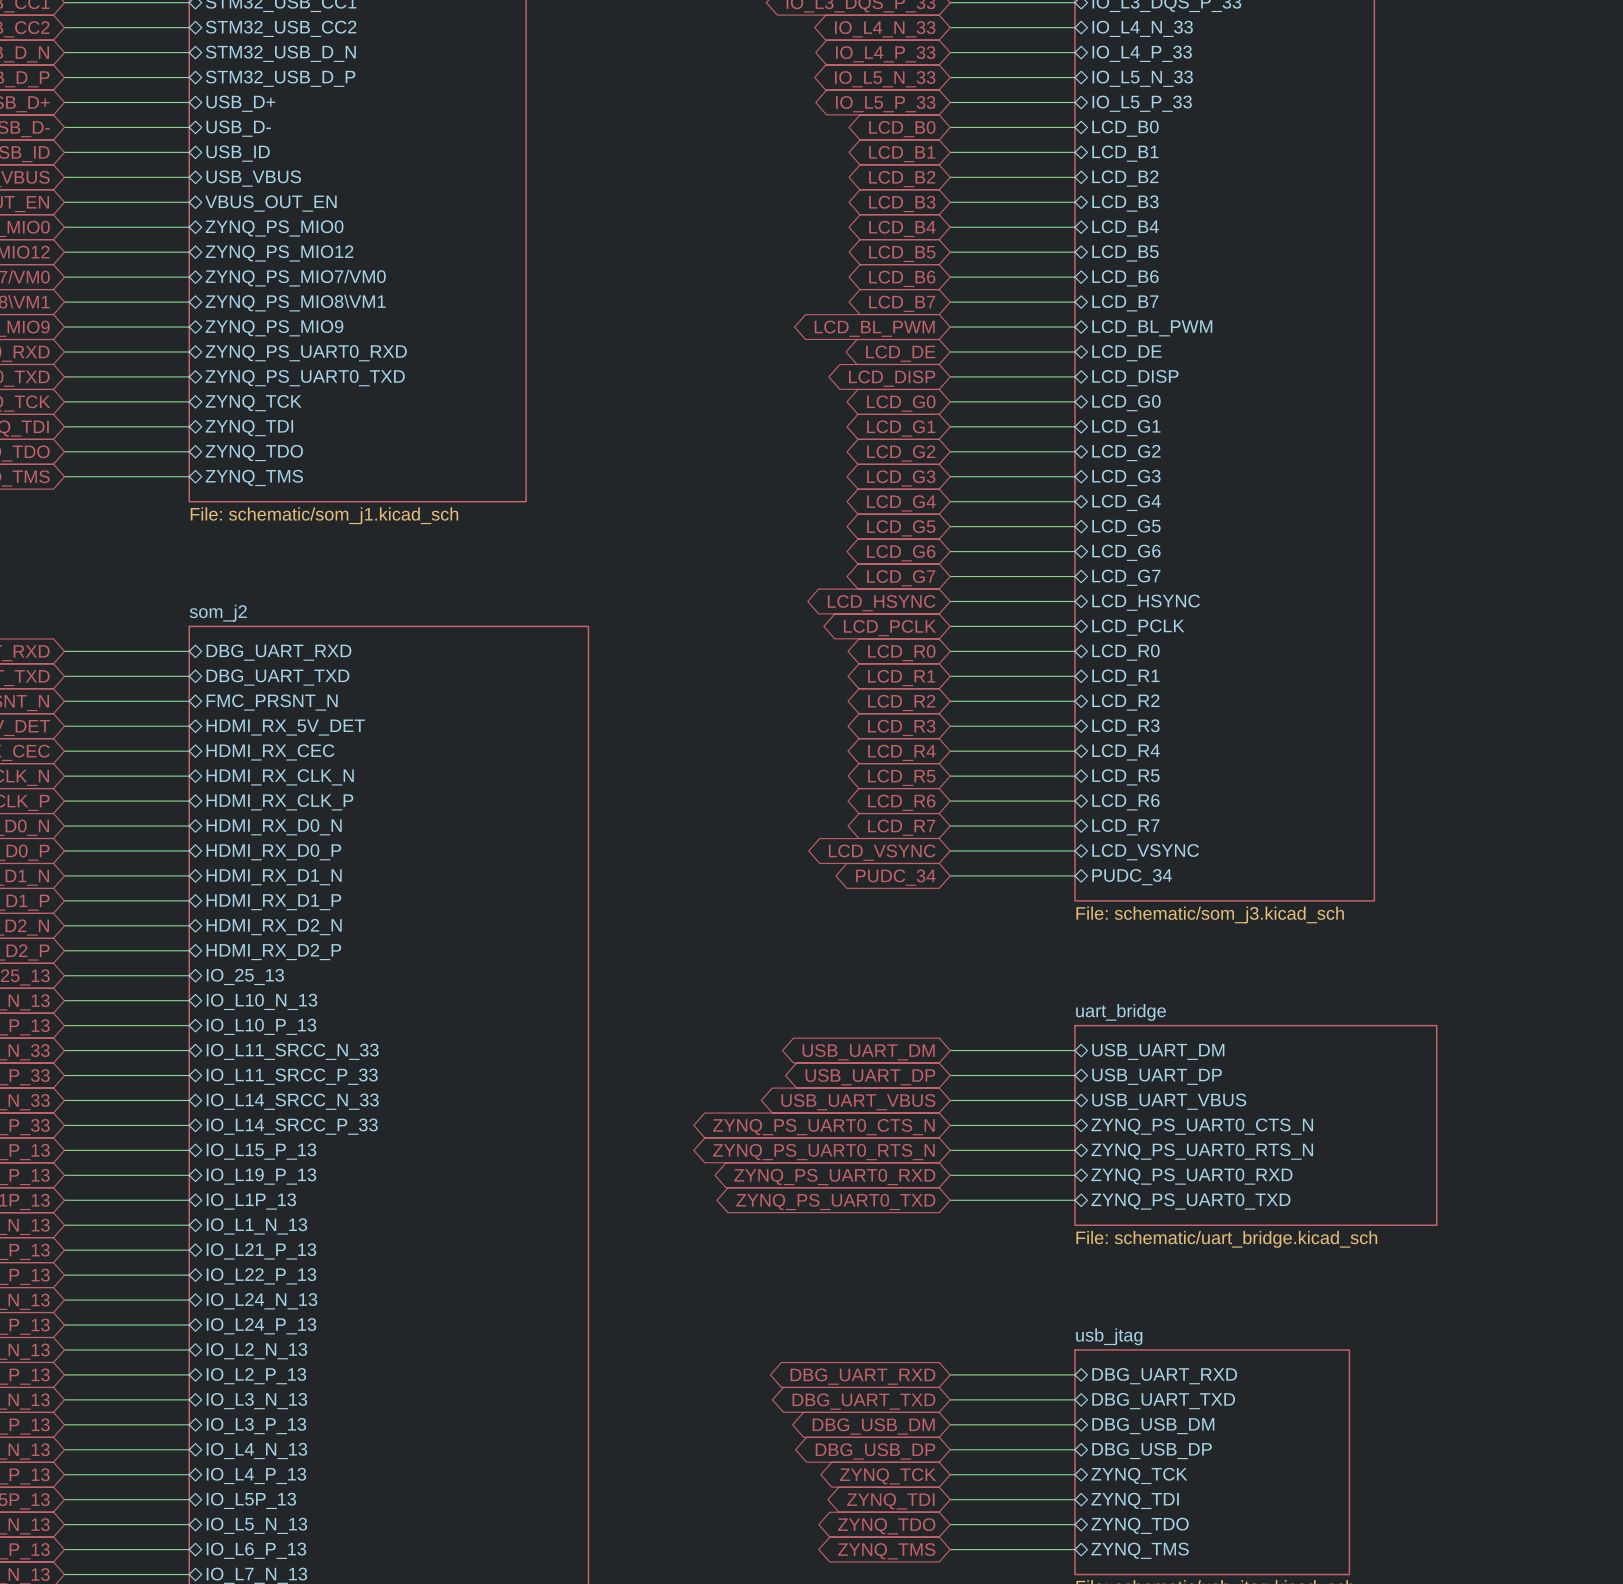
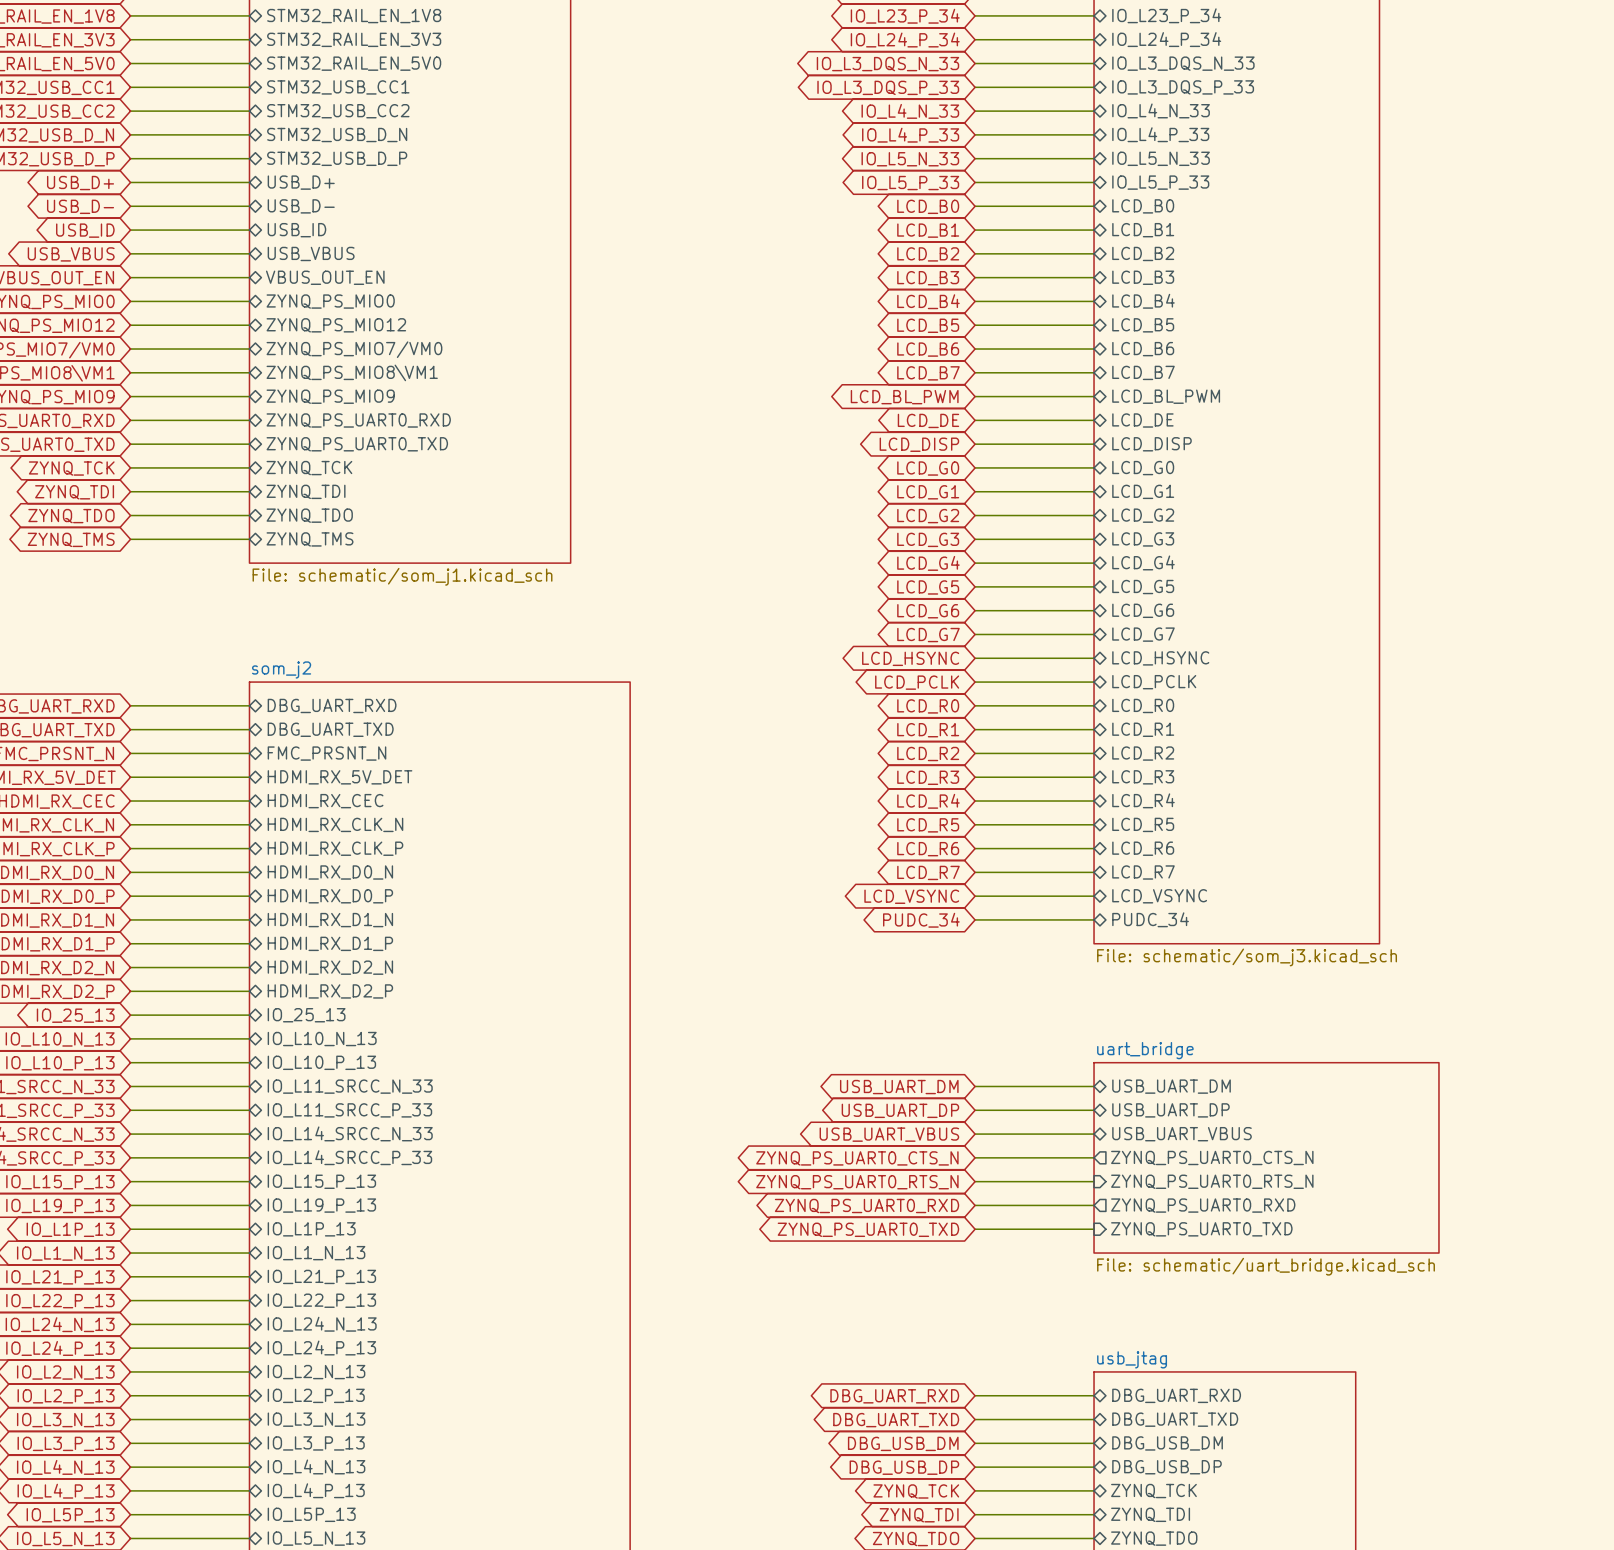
sheet pin shape: bidirectional (1202, 1126) -> output (1212, 1157)
sheet pin shape: bidirectional (1202, 1151) -> input (1212, 1181)
sheet pin shape: bidirectional (1191, 1176) -> output (1203, 1205)
sheet pin shape: bidirectional (1190, 1201) -> input (1201, 1229)

